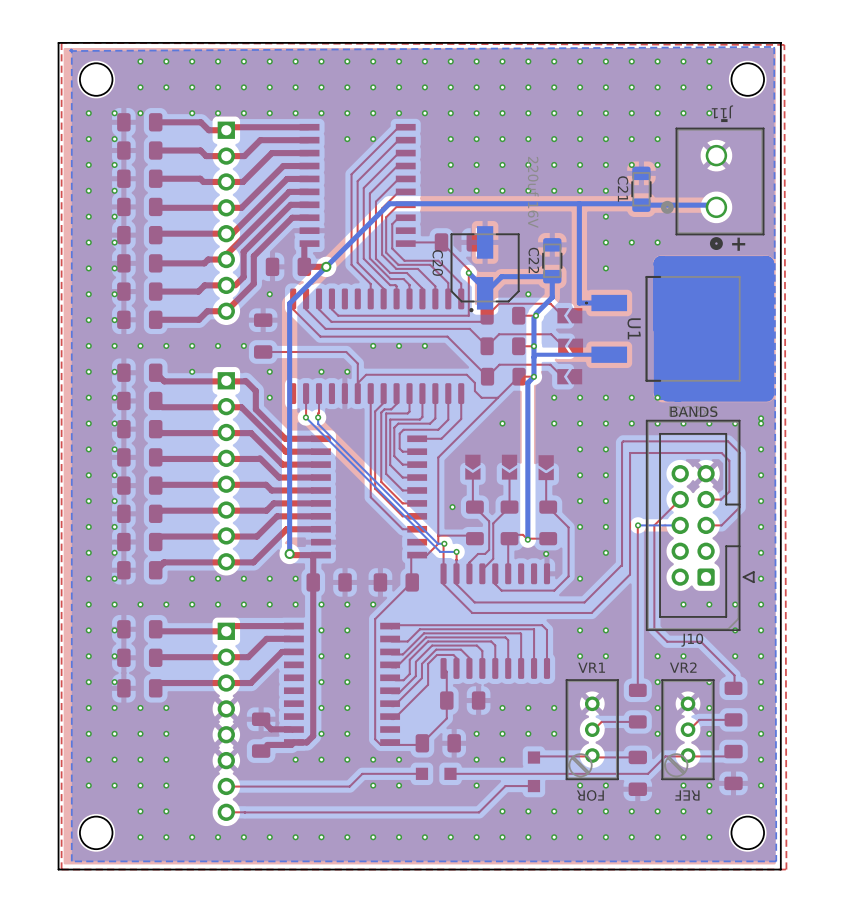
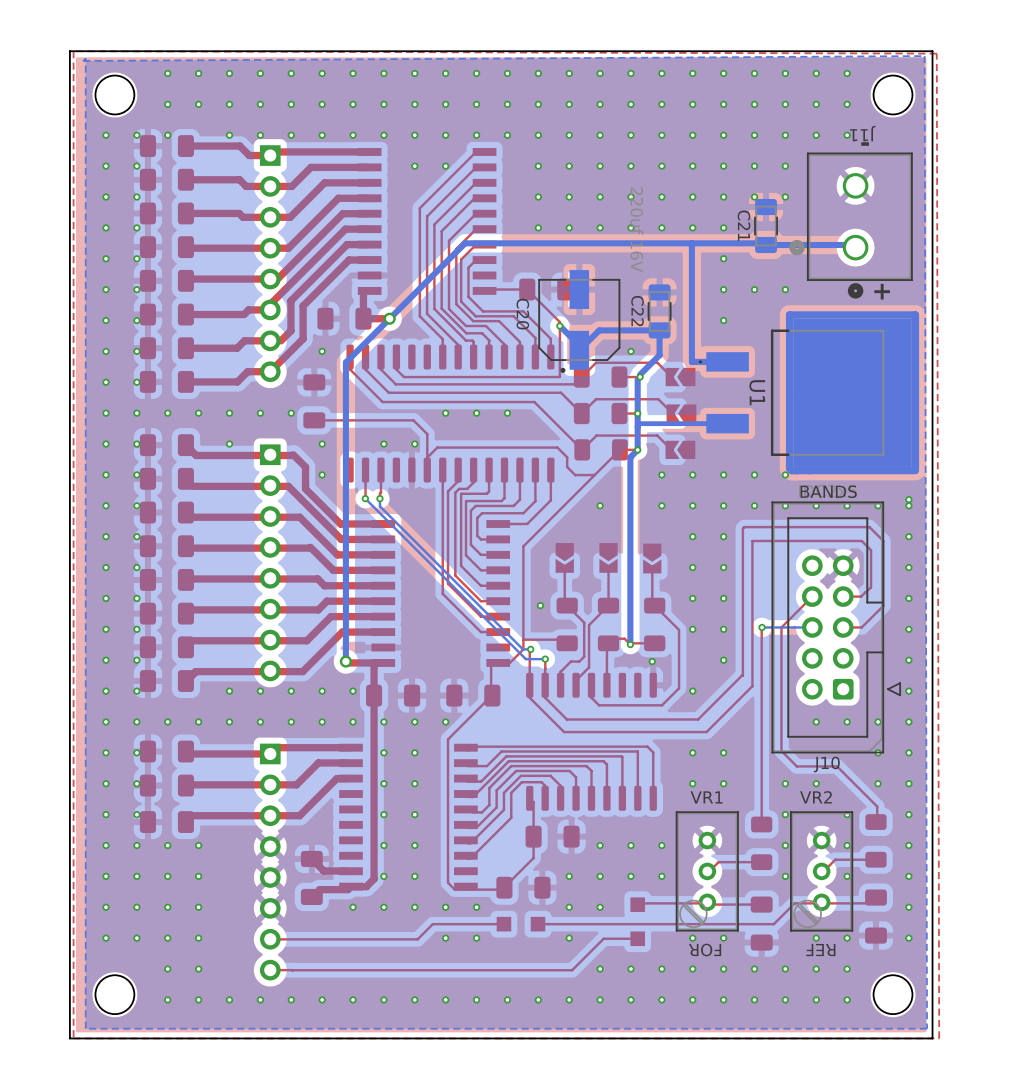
bottom track width: thick (661, 392) (661, 263) (766, 263) (766, 392) -> thin (789, 468) (789, 314) (915, 314) (915, 468)
bottom track width: thick (766, 394) (667, 394) -> thin (915, 470) (797, 470)

